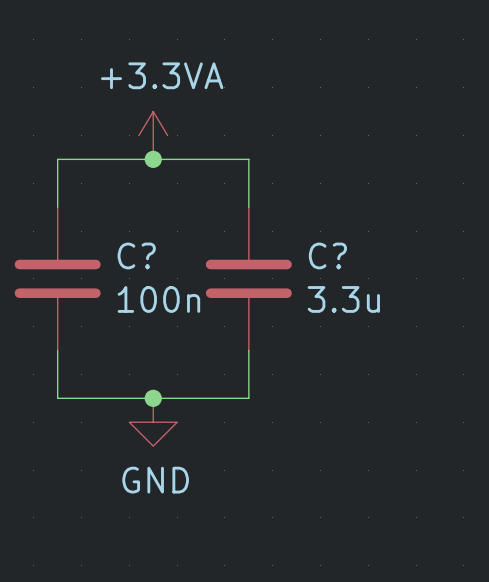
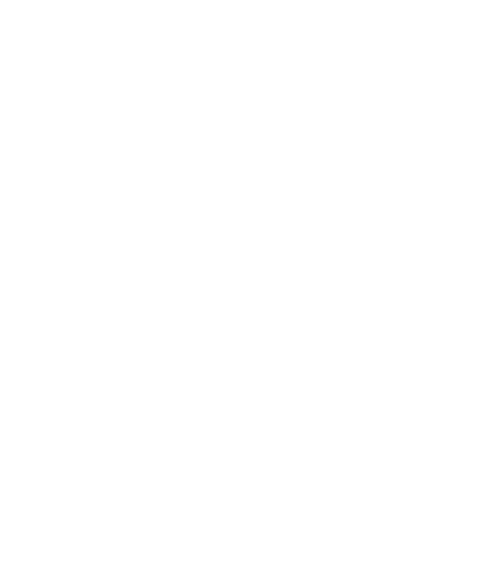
power symbol: +3.3VA (153, 135) -> none
junction: (153, 159) -> none
wire: (57, 207) (57, 159) (248, 159) (248, 207) -> none
C?: 100n (57, 278) -> none
C?: 3.3u (248, 278) -> none
wire: (57, 350) (57, 398) (248, 398) (248, 350) -> none
junction: (153, 398) -> none
power symbol: GND (153, 422) -> none

